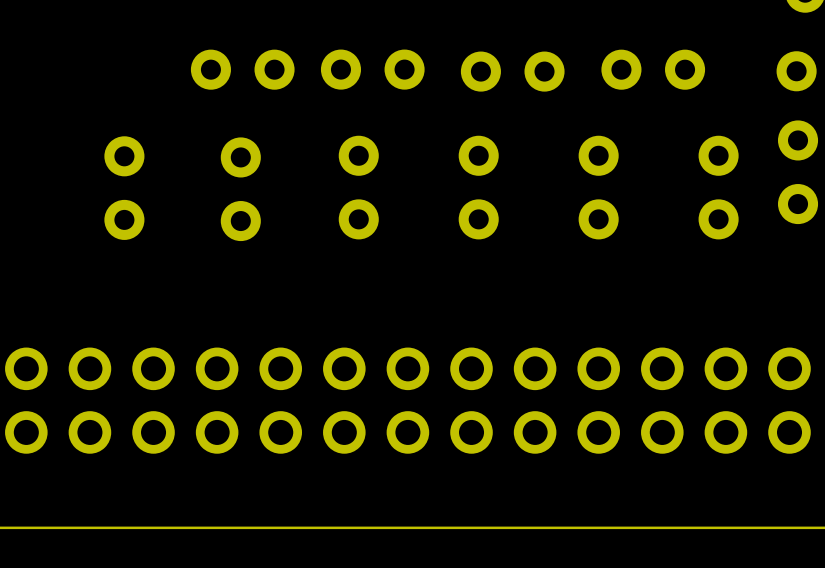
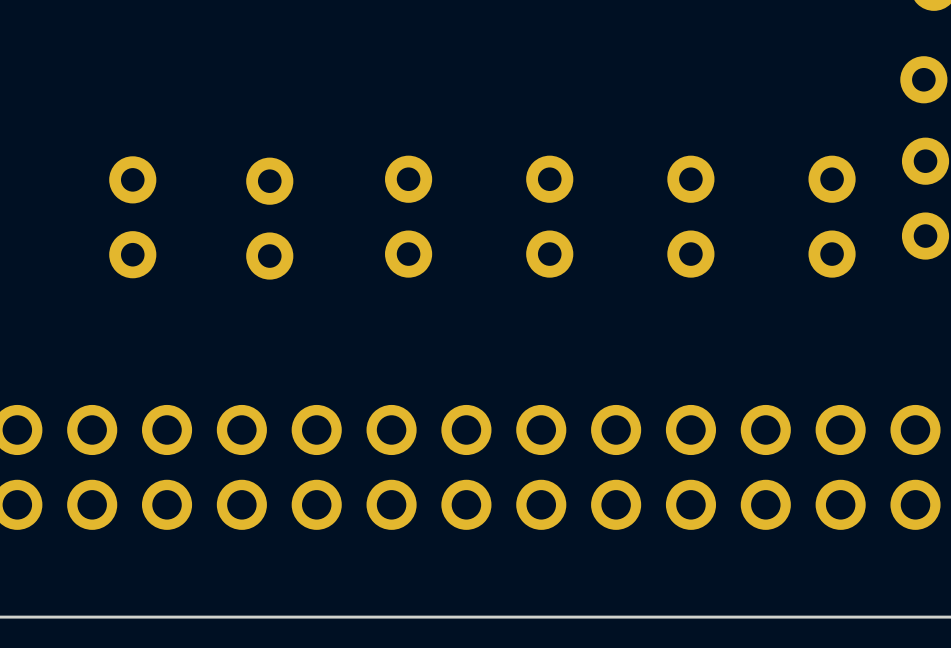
part: (242, 69) -> none
part: (372, 69) -> none
part: (653, 69) -> none
part: (512, 71) -> none

